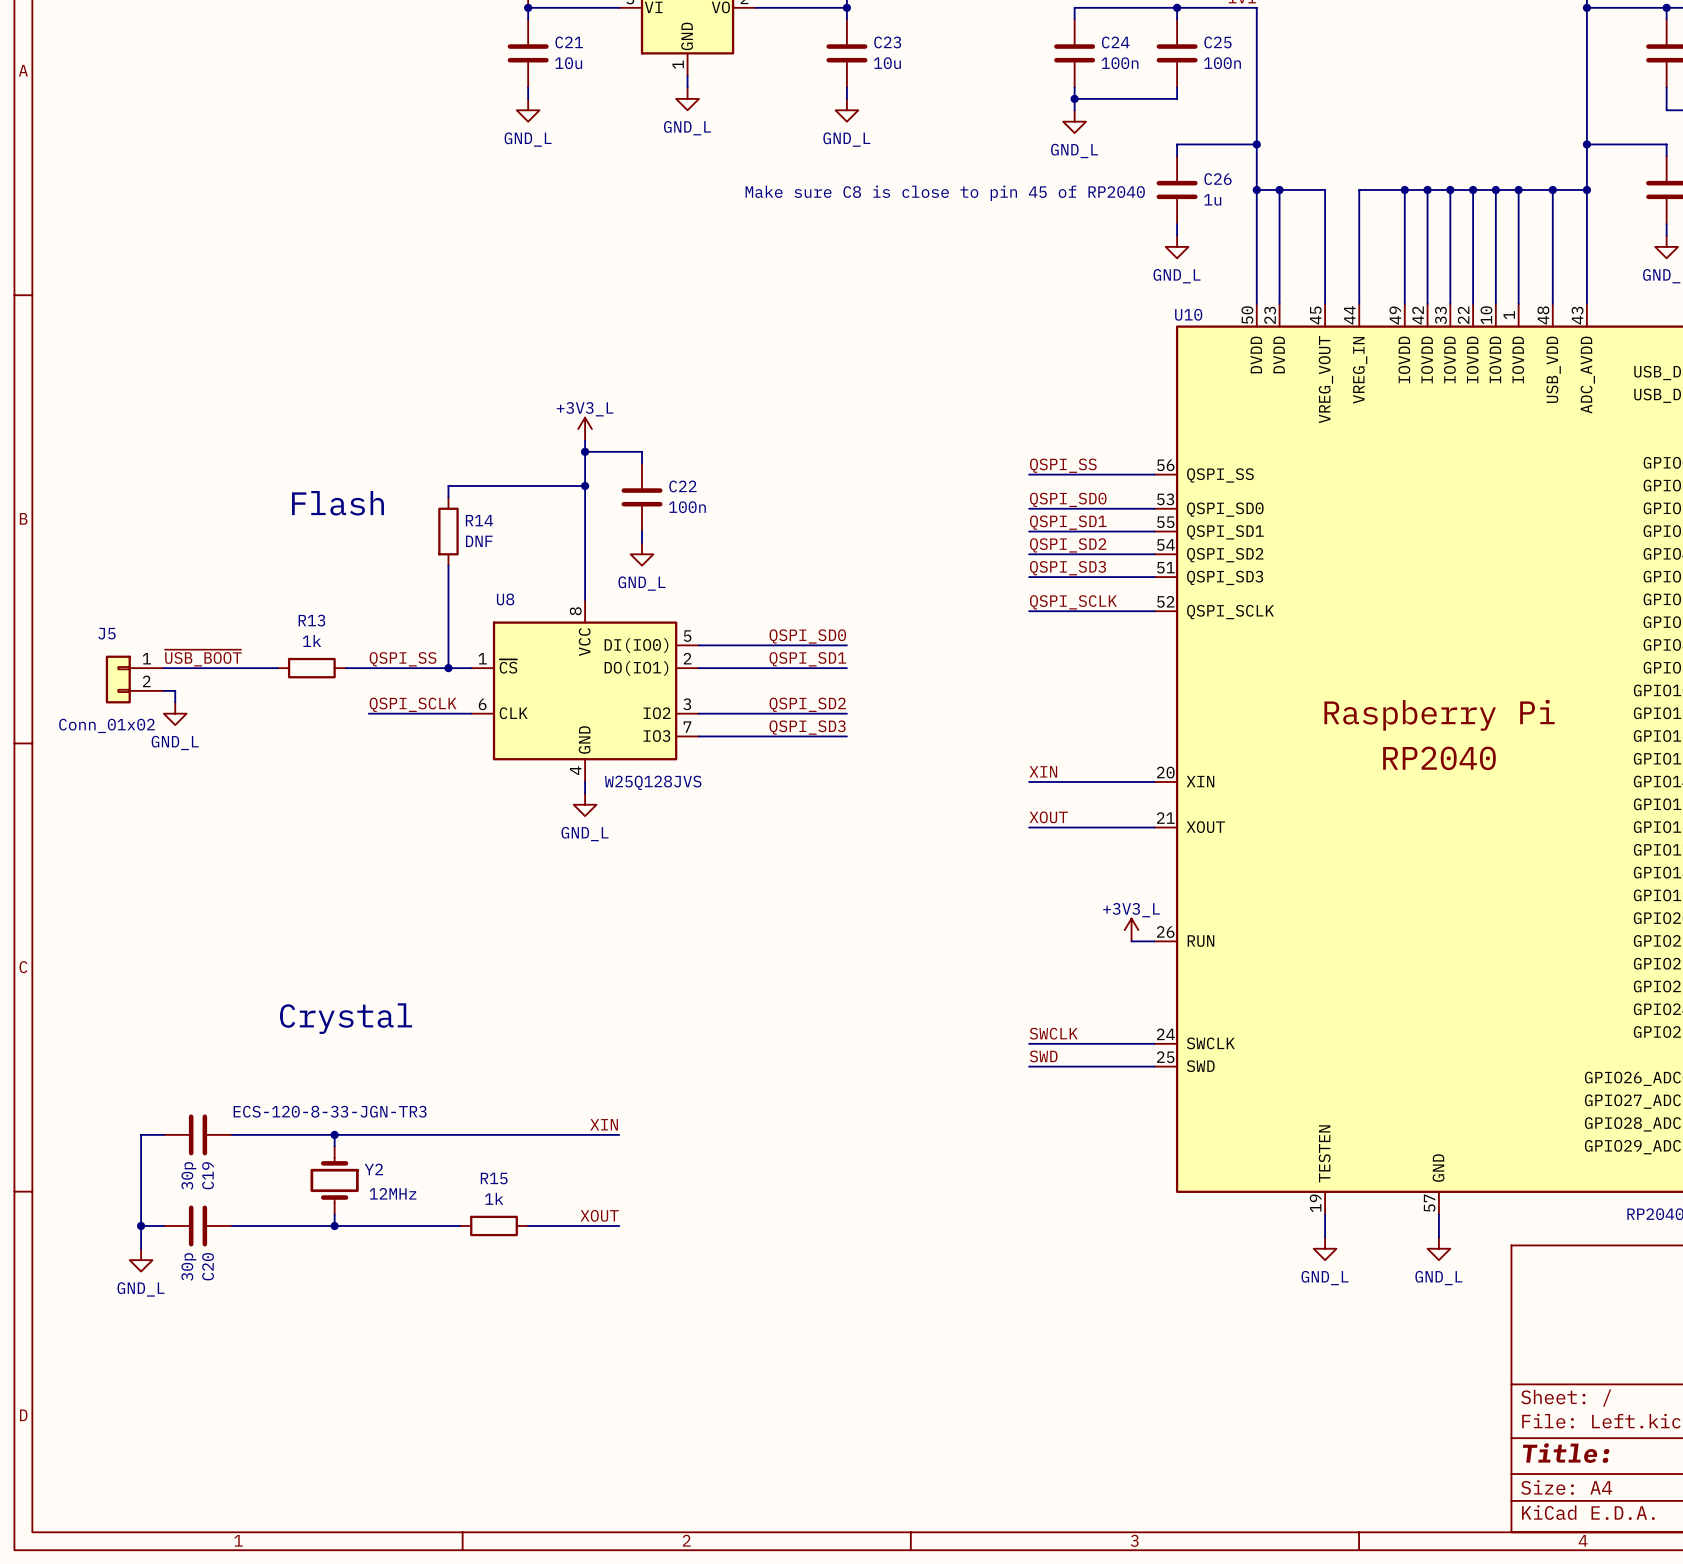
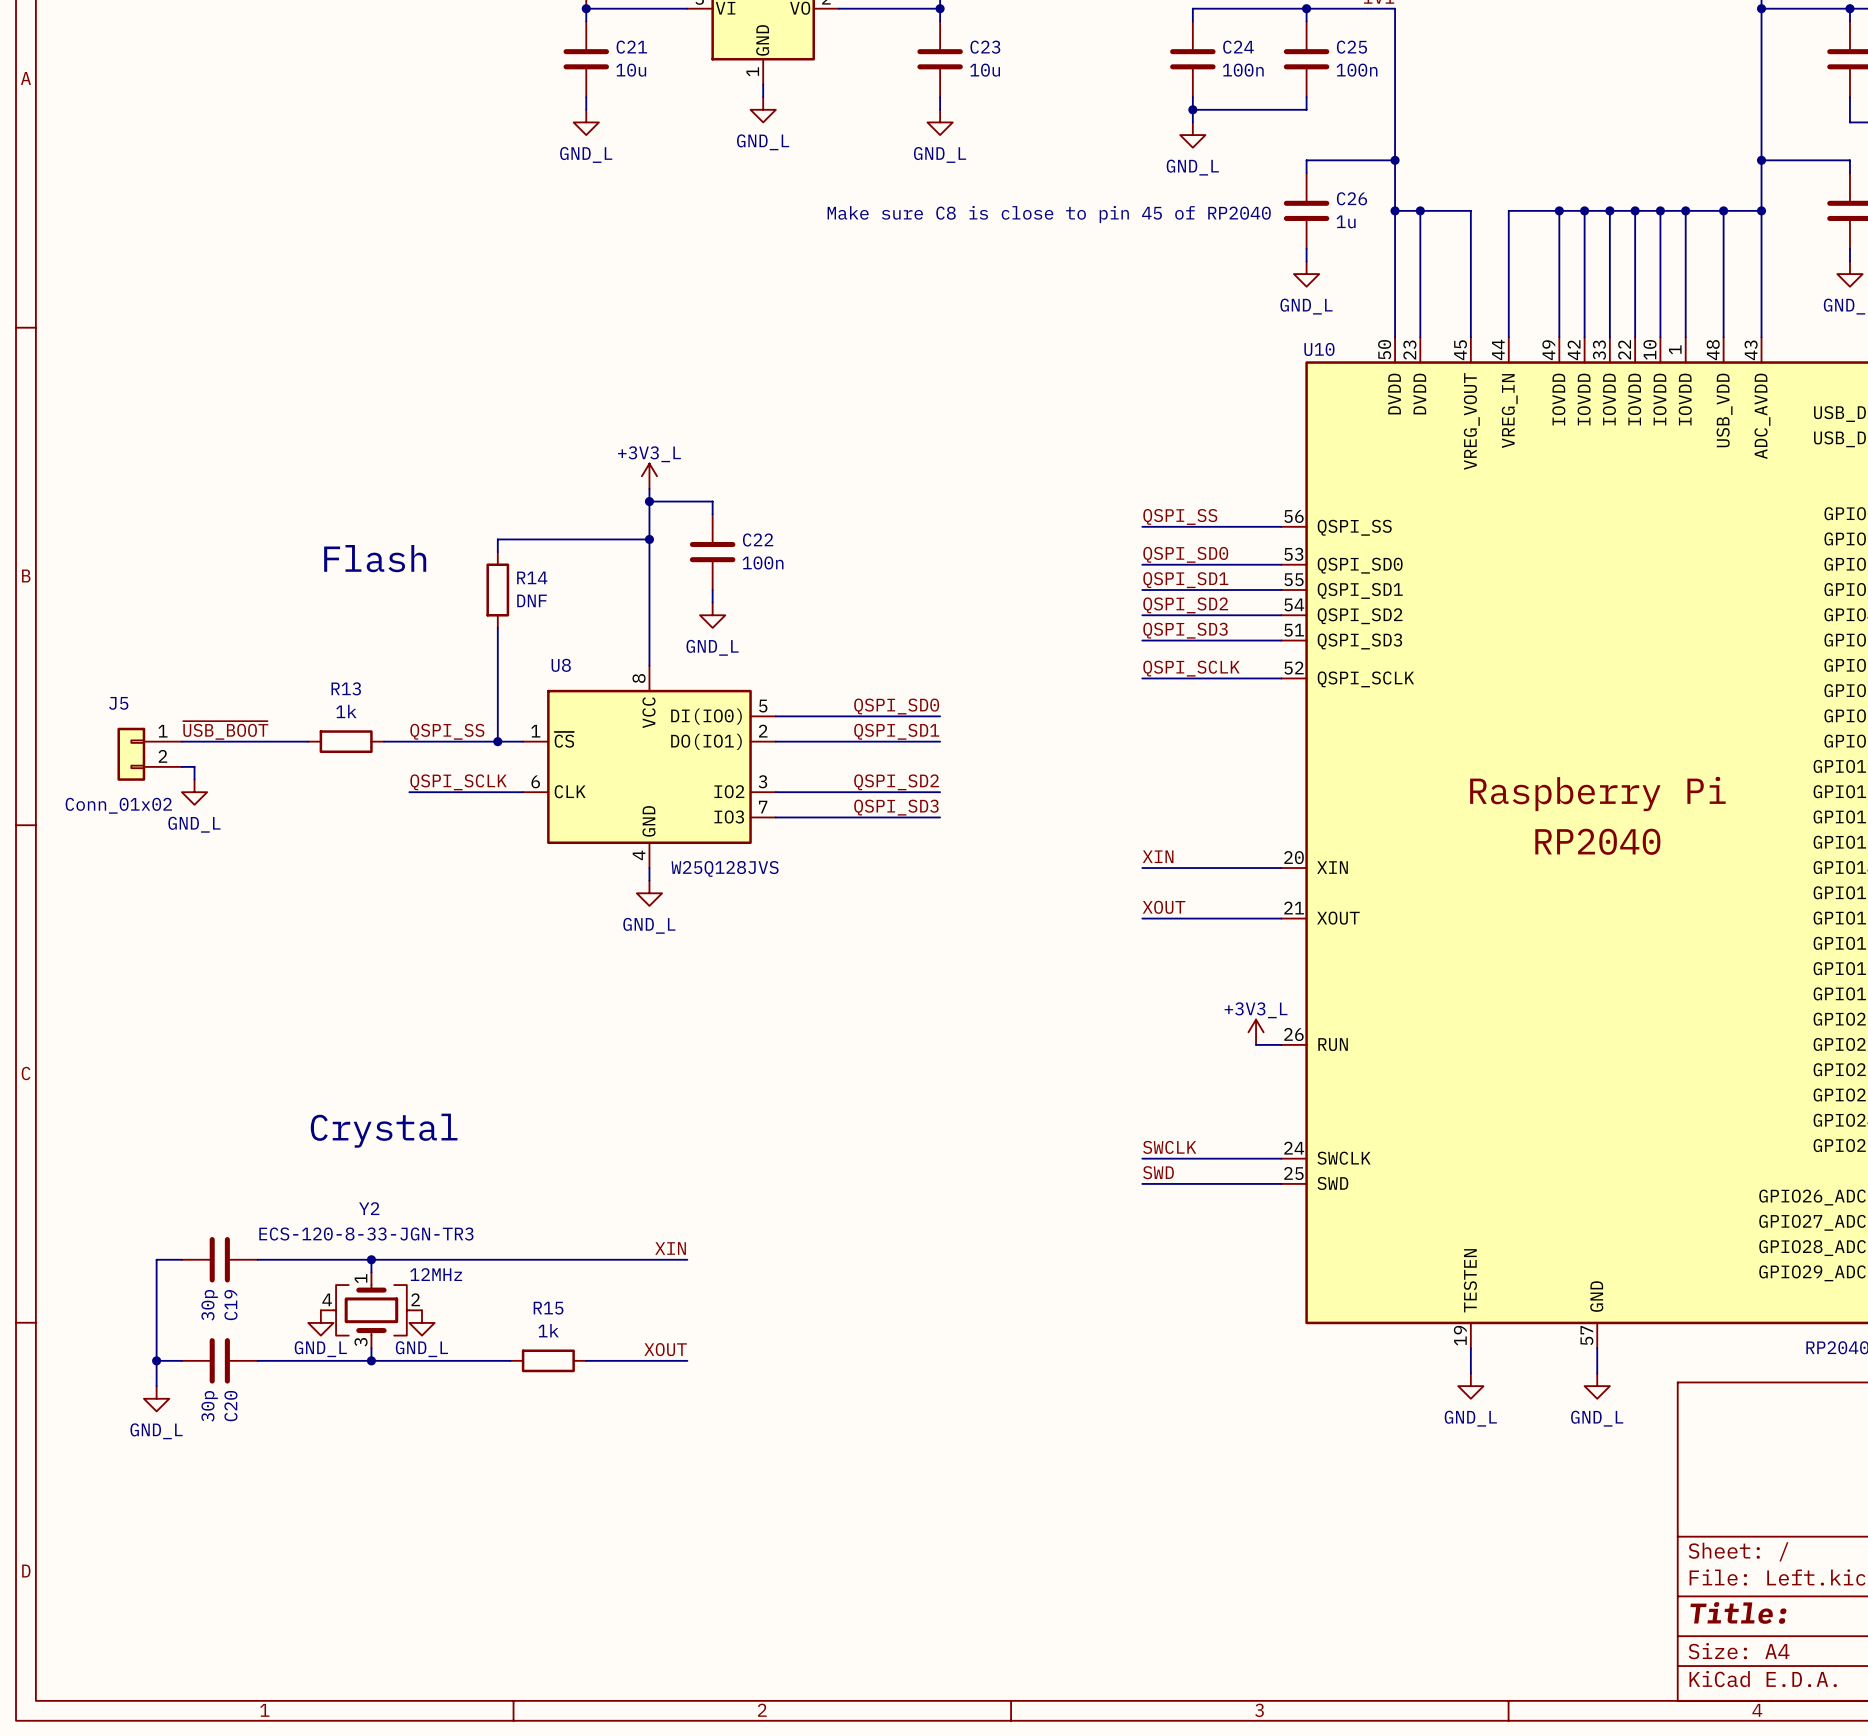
Y2 symbol: [310, 1146, 359, 1215] -> [320, 1272, 422, 1349]
Y2 name position: Y2 (373, 1169) -> Y2 (369, 1208)
power symbol: none -> GND_L (320, 1322)
power symbol: none -> GND_L (421, 1322)
text position: 12MHz (392, 1193) -> 12MHz (436, 1274)

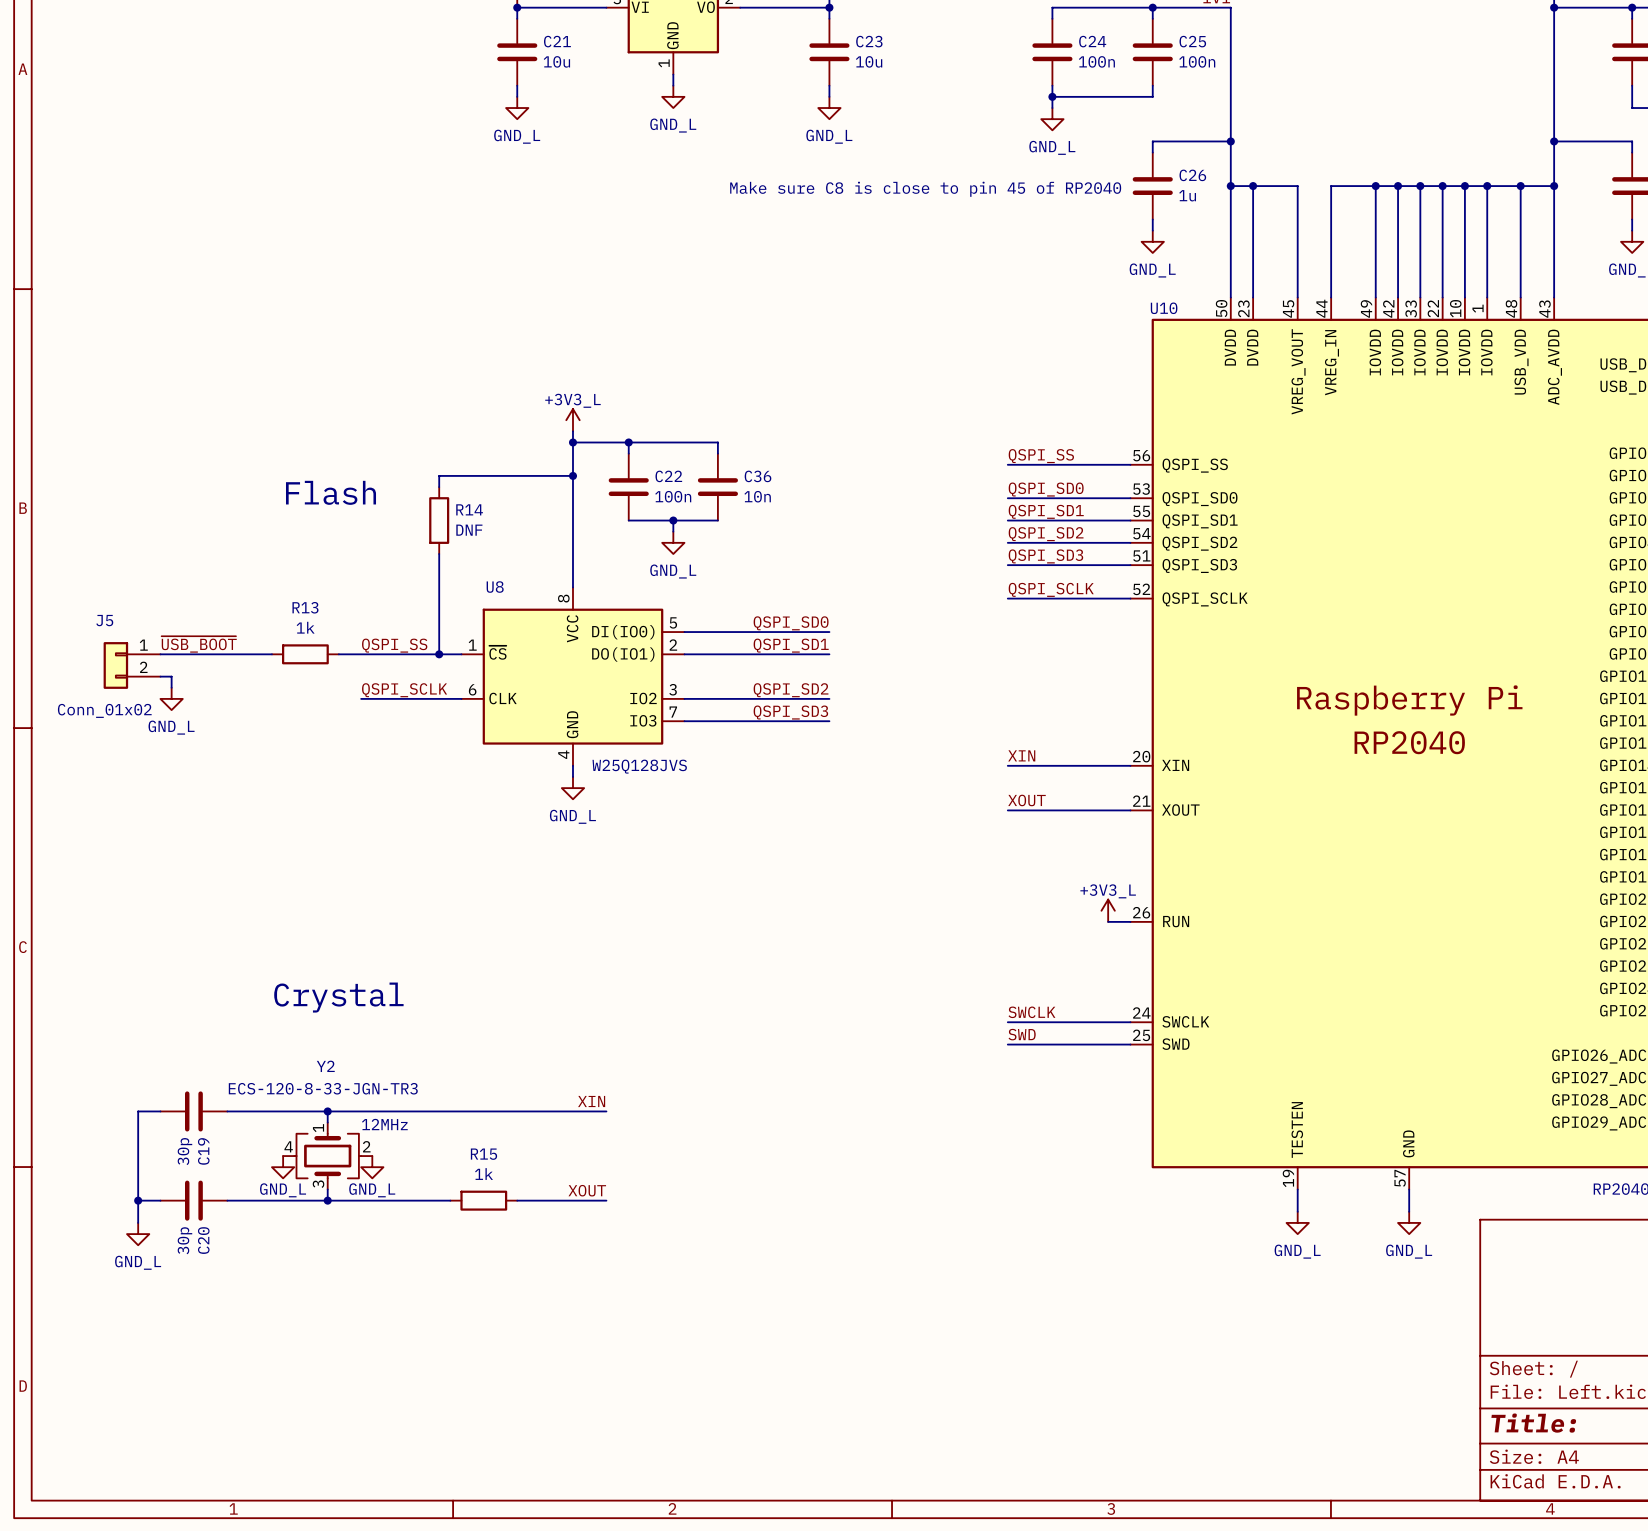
wire: none -> (628, 442) (717, 442) (717, 453)
junction: none -> (628, 442)
C36: none -> 10n (717, 487)
wire: (712, 590) (712, 602) -> (628, 520) (717, 520)
wire: none -> (673, 520) (673, 531)
junction: none -> (673, 520)
power symbol position: GND_L (712, 615) -> GND_L (673, 542)

